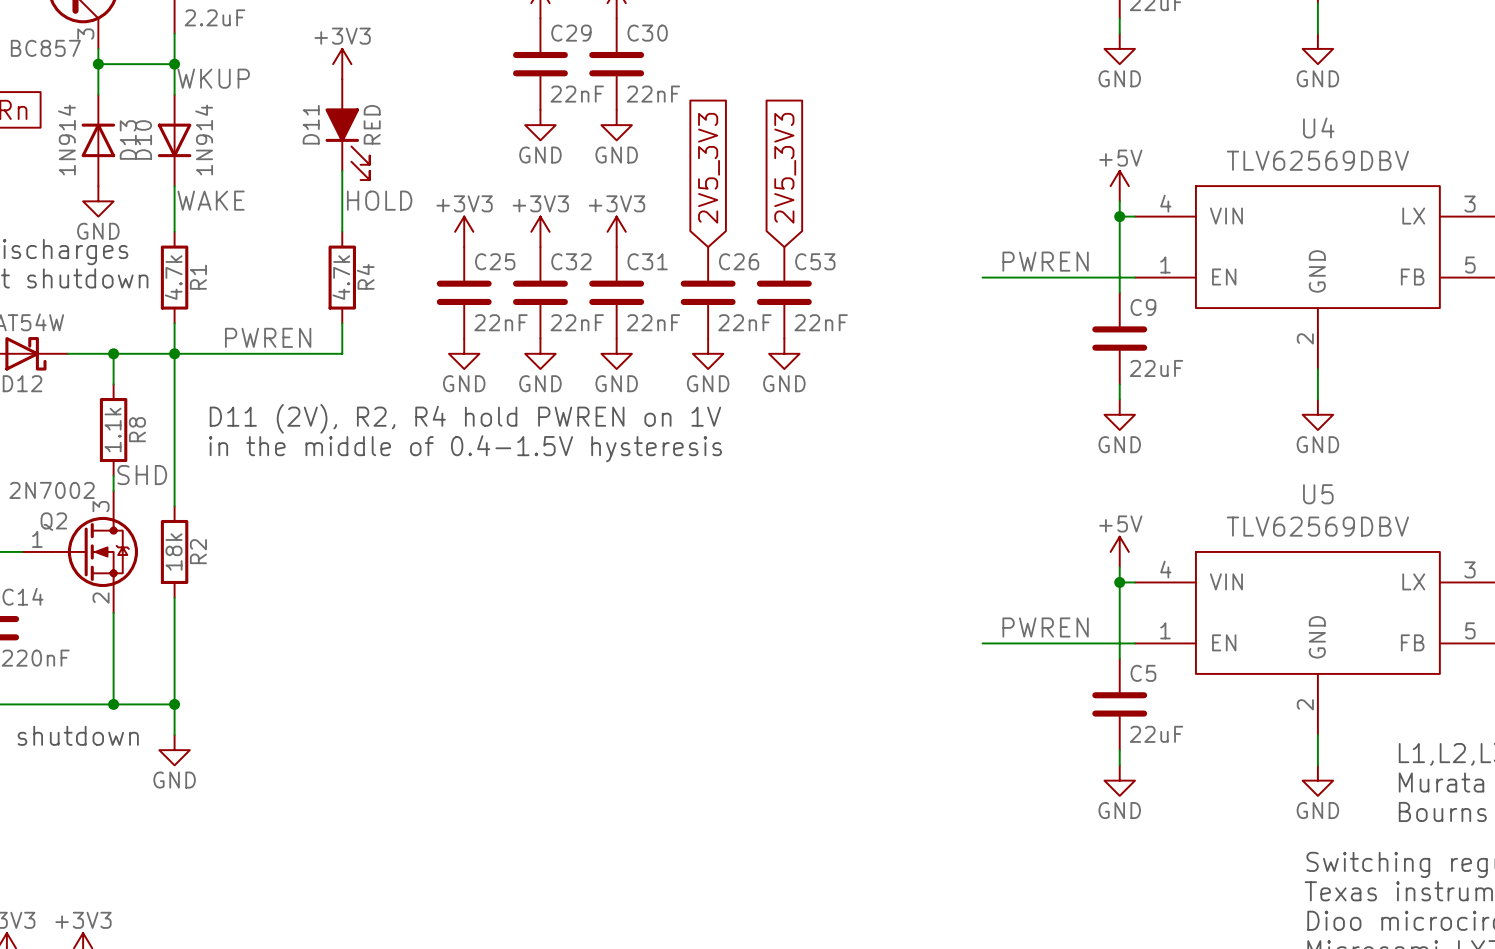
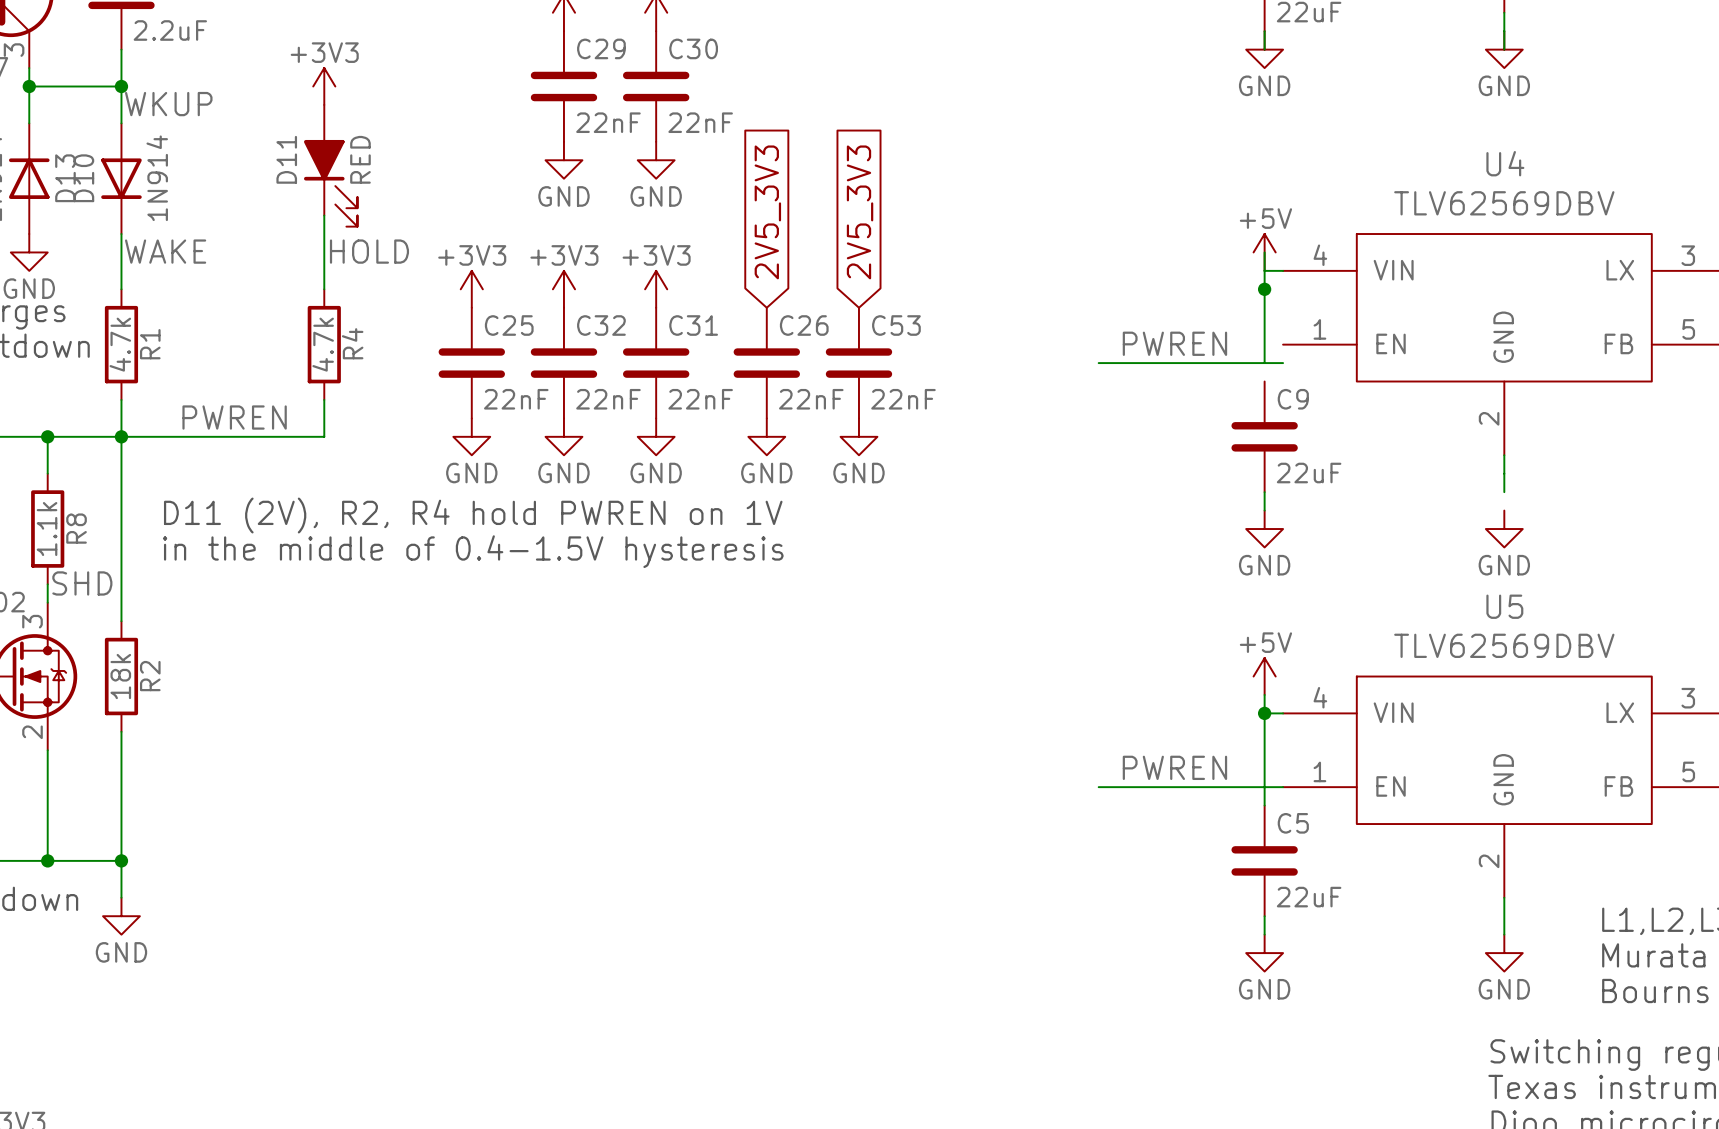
power symbol position: GND (1119, 48) -> GND (1264, 49)
power symbol position: GND (1317, 48) -> GND (1504, 49)
power symbol position: +5V (1119, 186) -> +5V (1264, 252)
junction position: (1119, 216) -> (1264, 289)
label position: PWREN (1045, 261) -> PWREN (1174, 343)
wire: (982, 277) (1134, 277) -> (1098, 363) (1283, 363)
C9 position: (1119, 338) -> (1264, 436)
power symbol position: GND (1119, 414) -> GND (1264, 529)
power symbol position: GND (1317, 414) -> GND (1504, 529)

